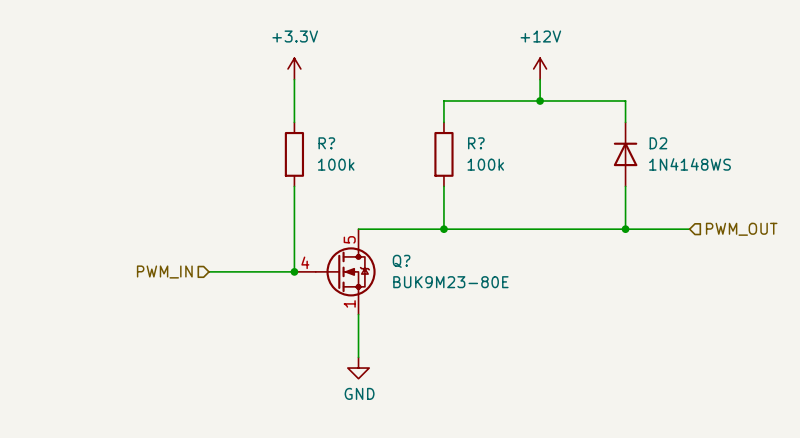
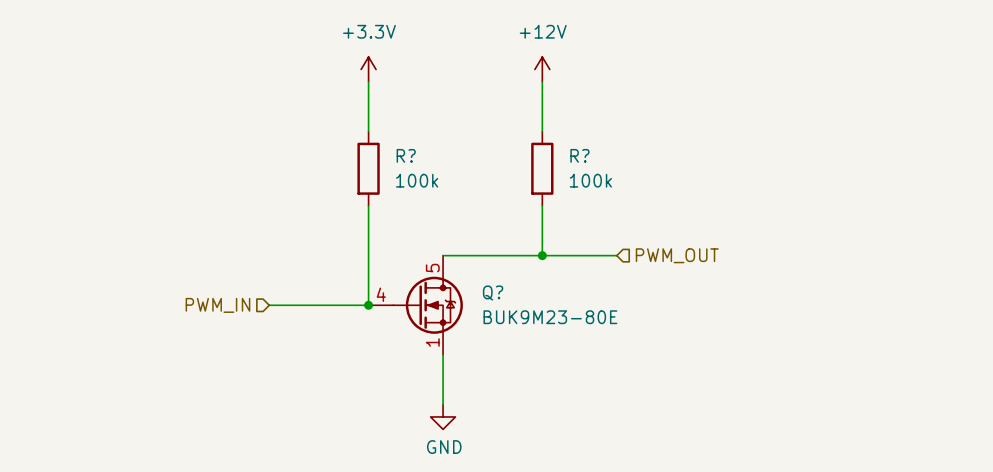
power symbol position: +12V (540, 68) -> +12V (542, 69)
wire: (540, 79) (540, 100) -> none
wire: (443, 100) (625, 100) (625, 122) -> (542, 106) (542, 81)
junction: (540, 100) -> none
D2: 1N4148WS (625, 154) -> none
wire: (625, 186) (625, 229) -> none
wire: (508, 229) (689, 229) -> none
junction: (625, 229) -> none
hierarchical label position: PWM_OUT (741, 229) -> PWM_OUT (677, 255)

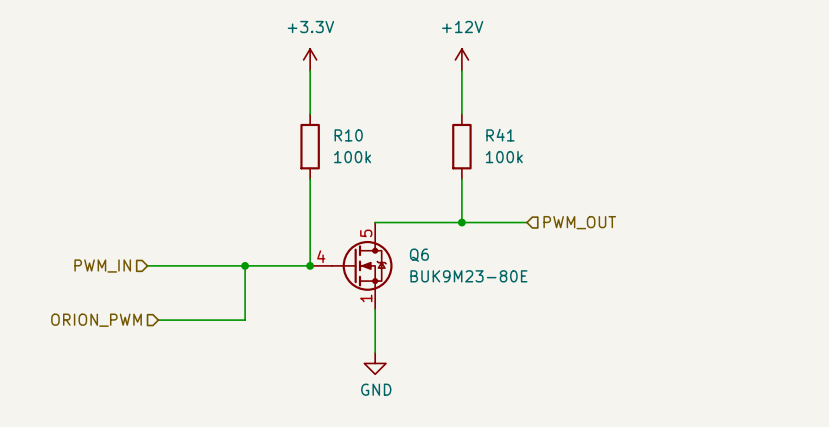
R? name: R? (406, 155) -> R10 (348, 135)
R? name: R? (579, 155) -> R41 (500, 135)
Q? name: Q? (493, 292) -> Q6 (419, 255)
wire: none -> (147, 265) (223, 265)
hierarchical label position: PWM_IN (217, 305) -> PWM_IN (102, 266)
wire: none -> (245, 265) (245, 320) (158, 320)
junction: none -> (245, 265)
hierarchical label: none -> ORION_PWM (96, 320)

